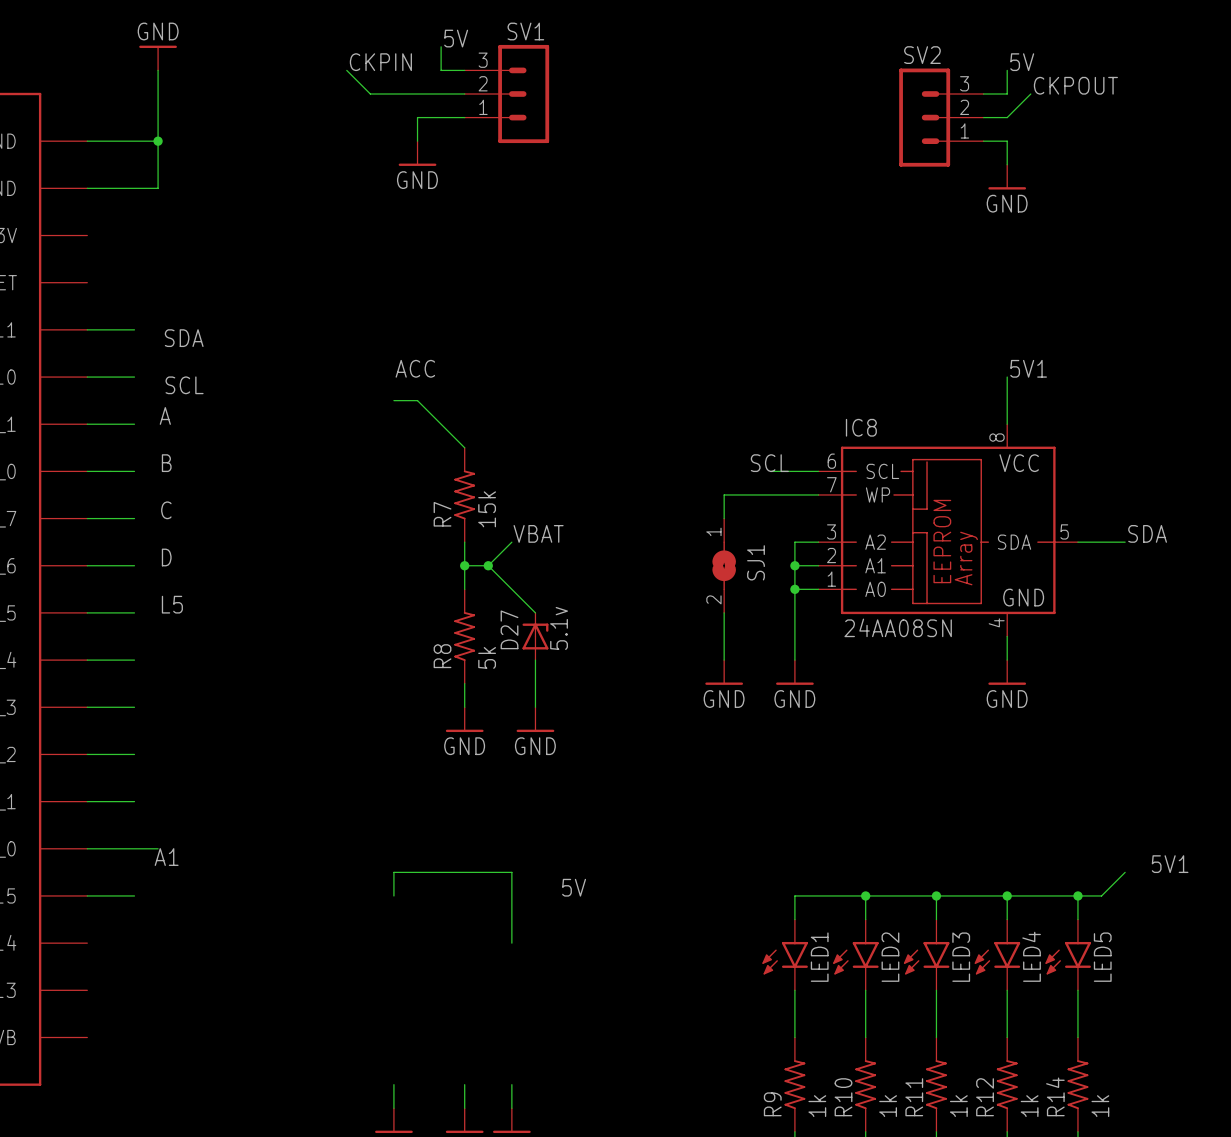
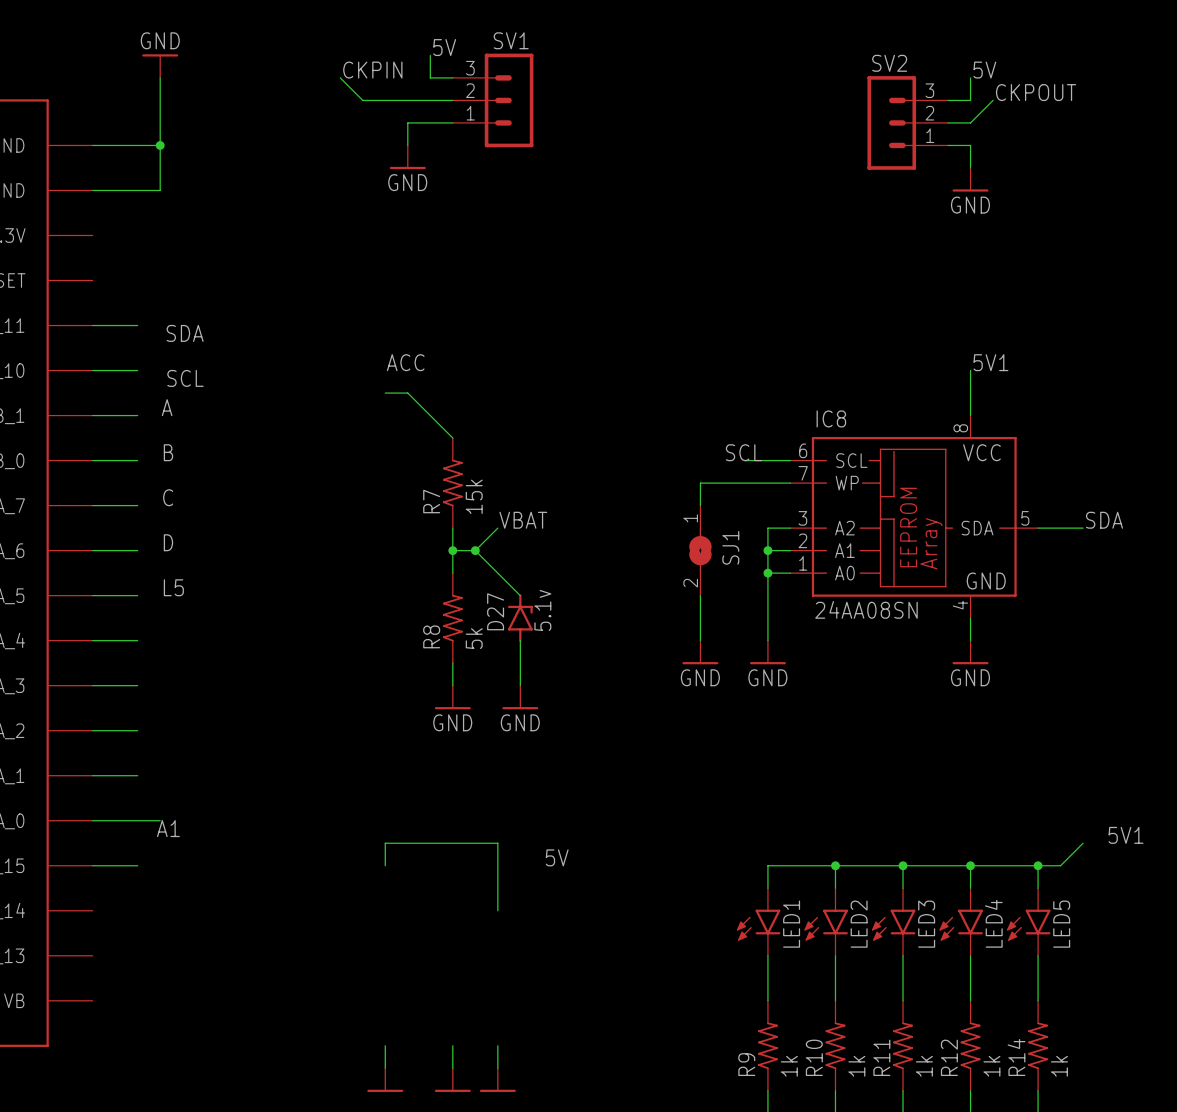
D27 symbol: [522, 612, 549, 661] -> [507, 594, 533, 642]

